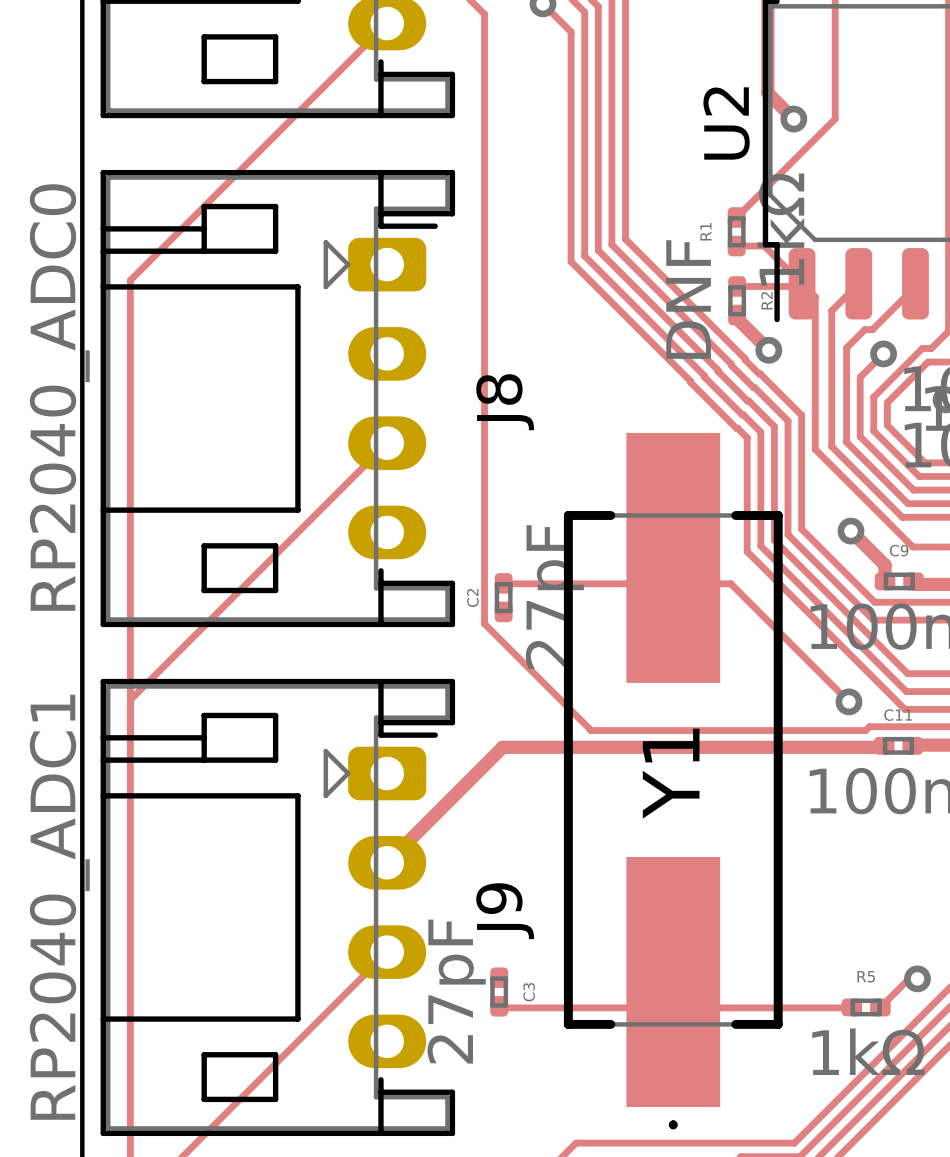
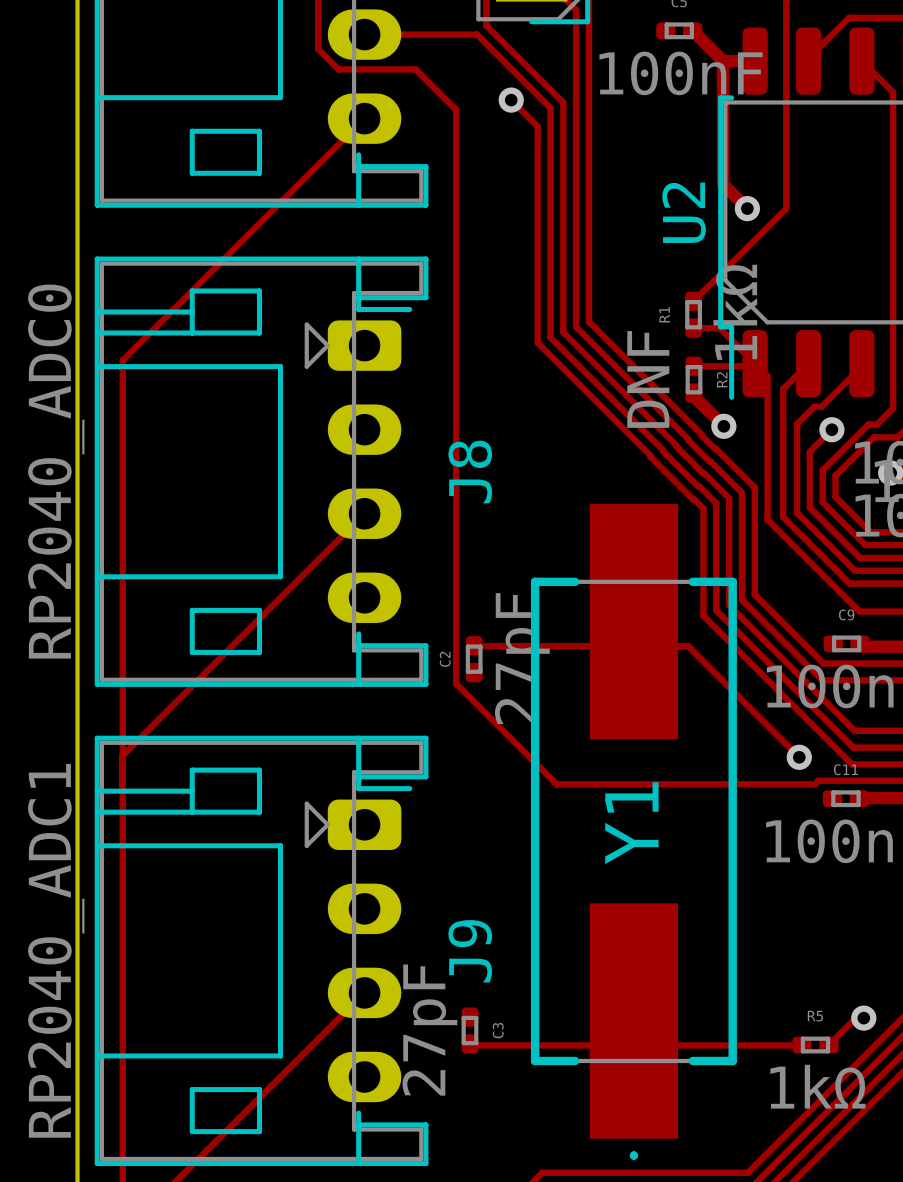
track: (850, 531) (884, 565) (884, 581) -> none
via: (850, 531) -> none
track: (884, 745) (502, 747) (387, 862) -> none

